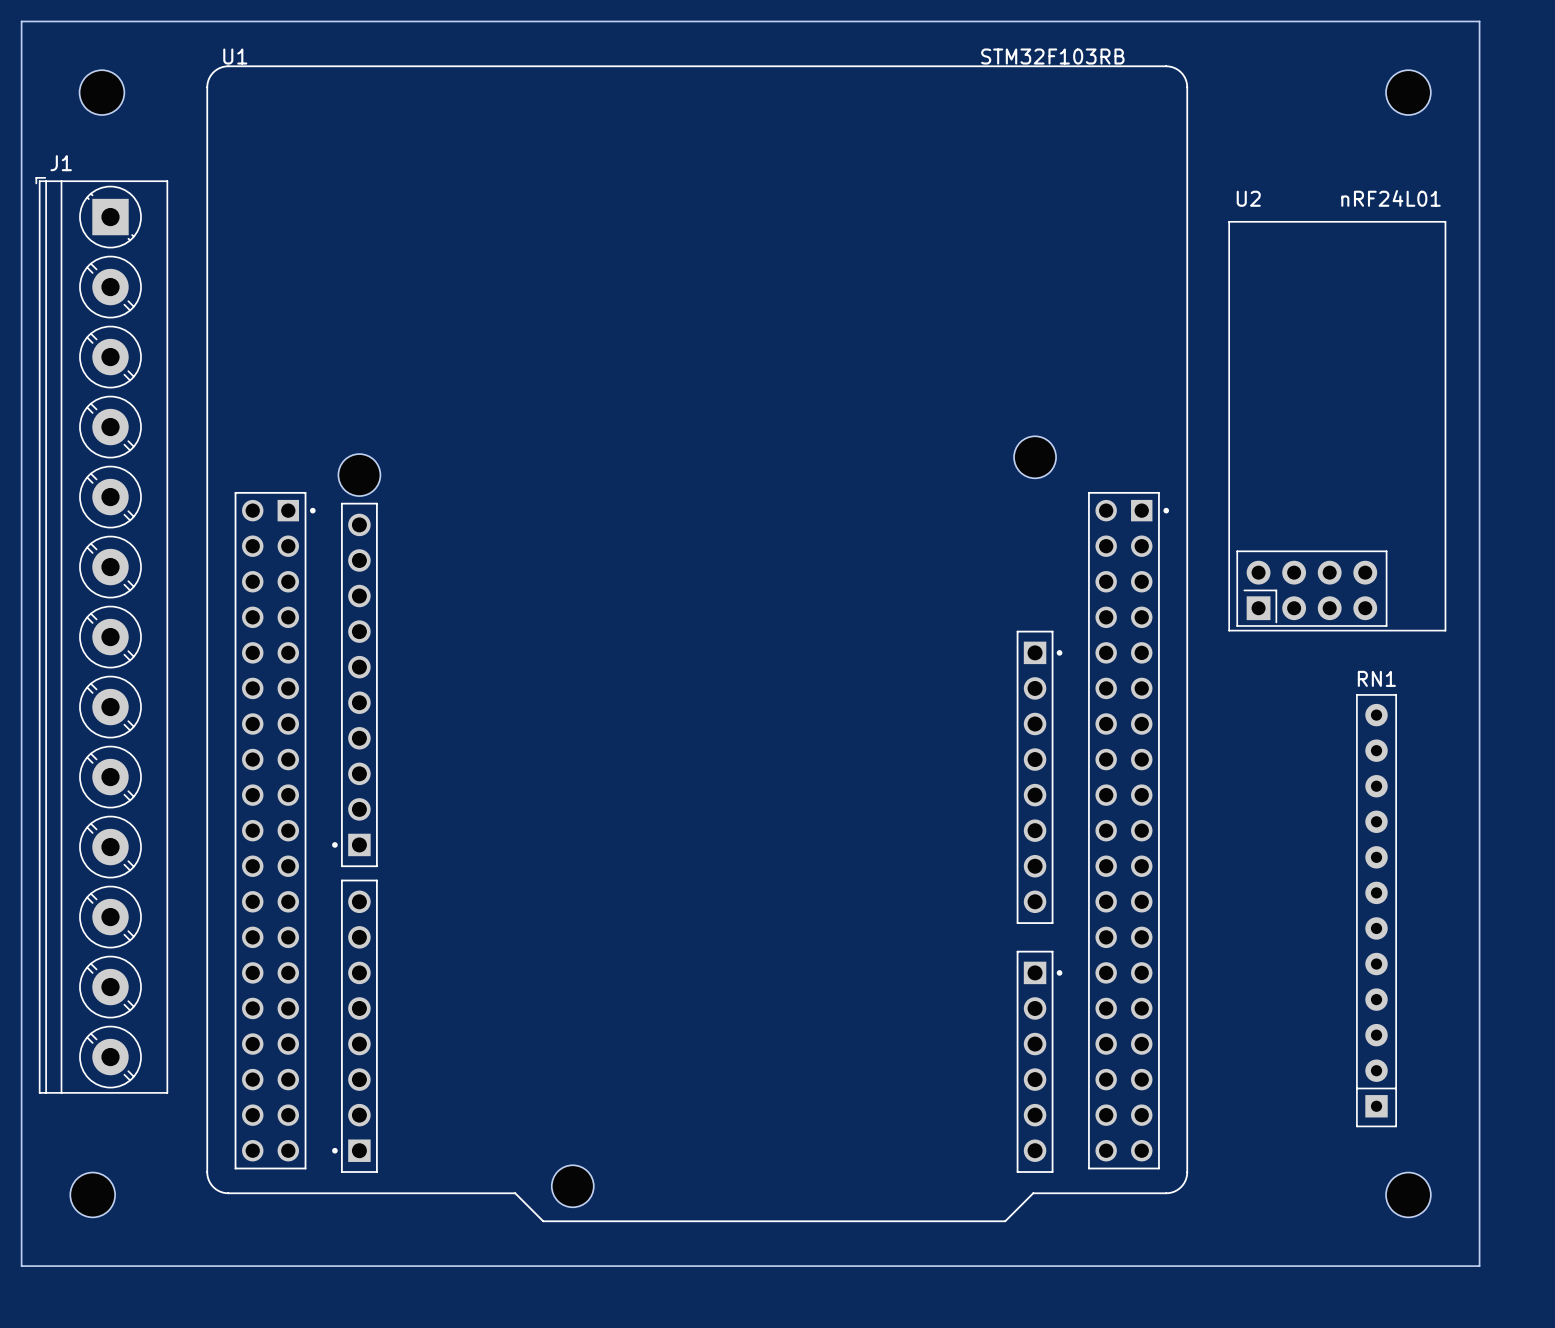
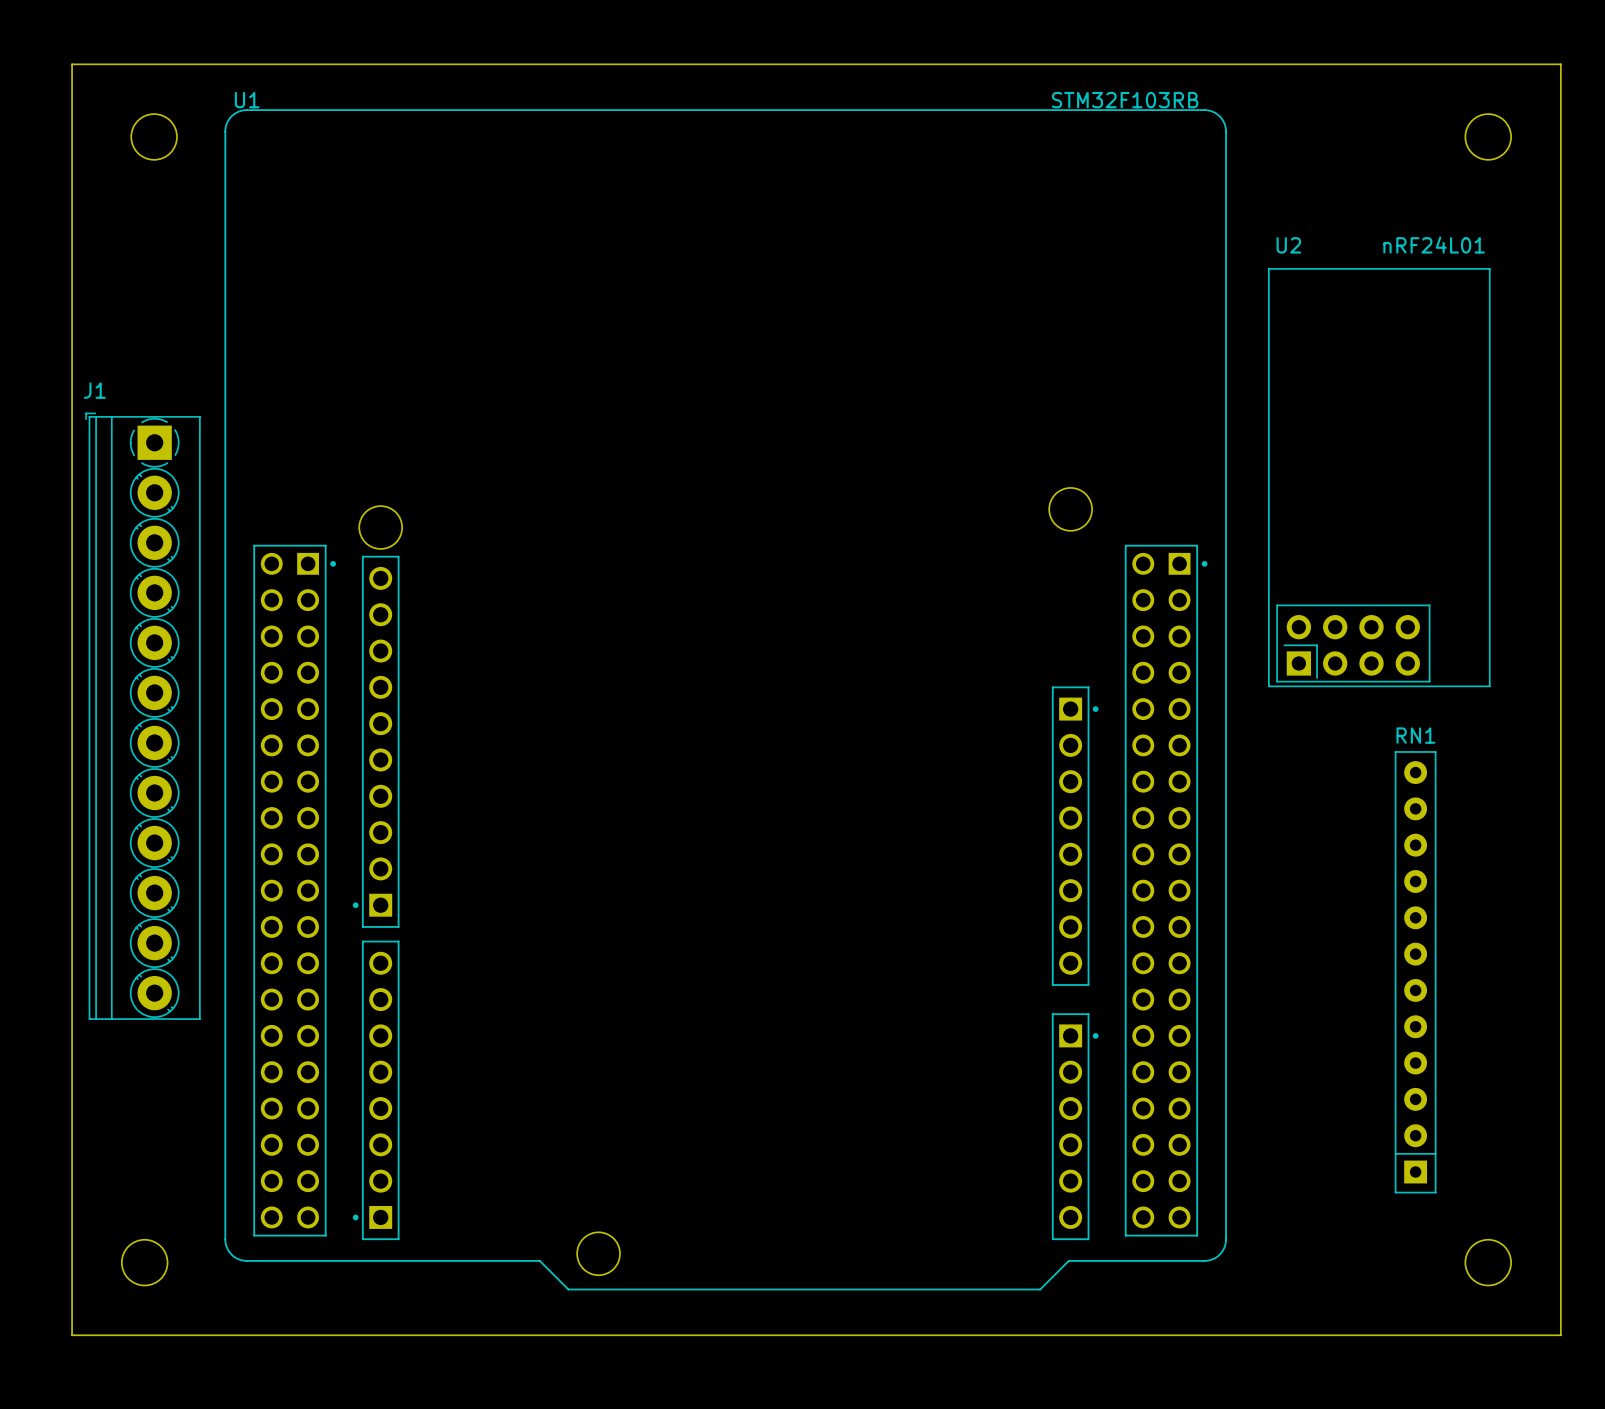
U1 name position: U1 (235, 56) -> U1 (247, 100)
J1 name position: J1 (61, 163) -> J1 (94, 390)
J1 footprint: [35, 177, 169, 1094] -> [85, 412, 201, 1020]
text position: nRF24L01 (1390, 198) -> nRF24L01 (1434, 245)
U2 position: (1337, 426) -> (1379, 477)
U1 position: (697, 643) -> (725, 699)
RN1 position: (1376, 910) -> (1415, 972)

